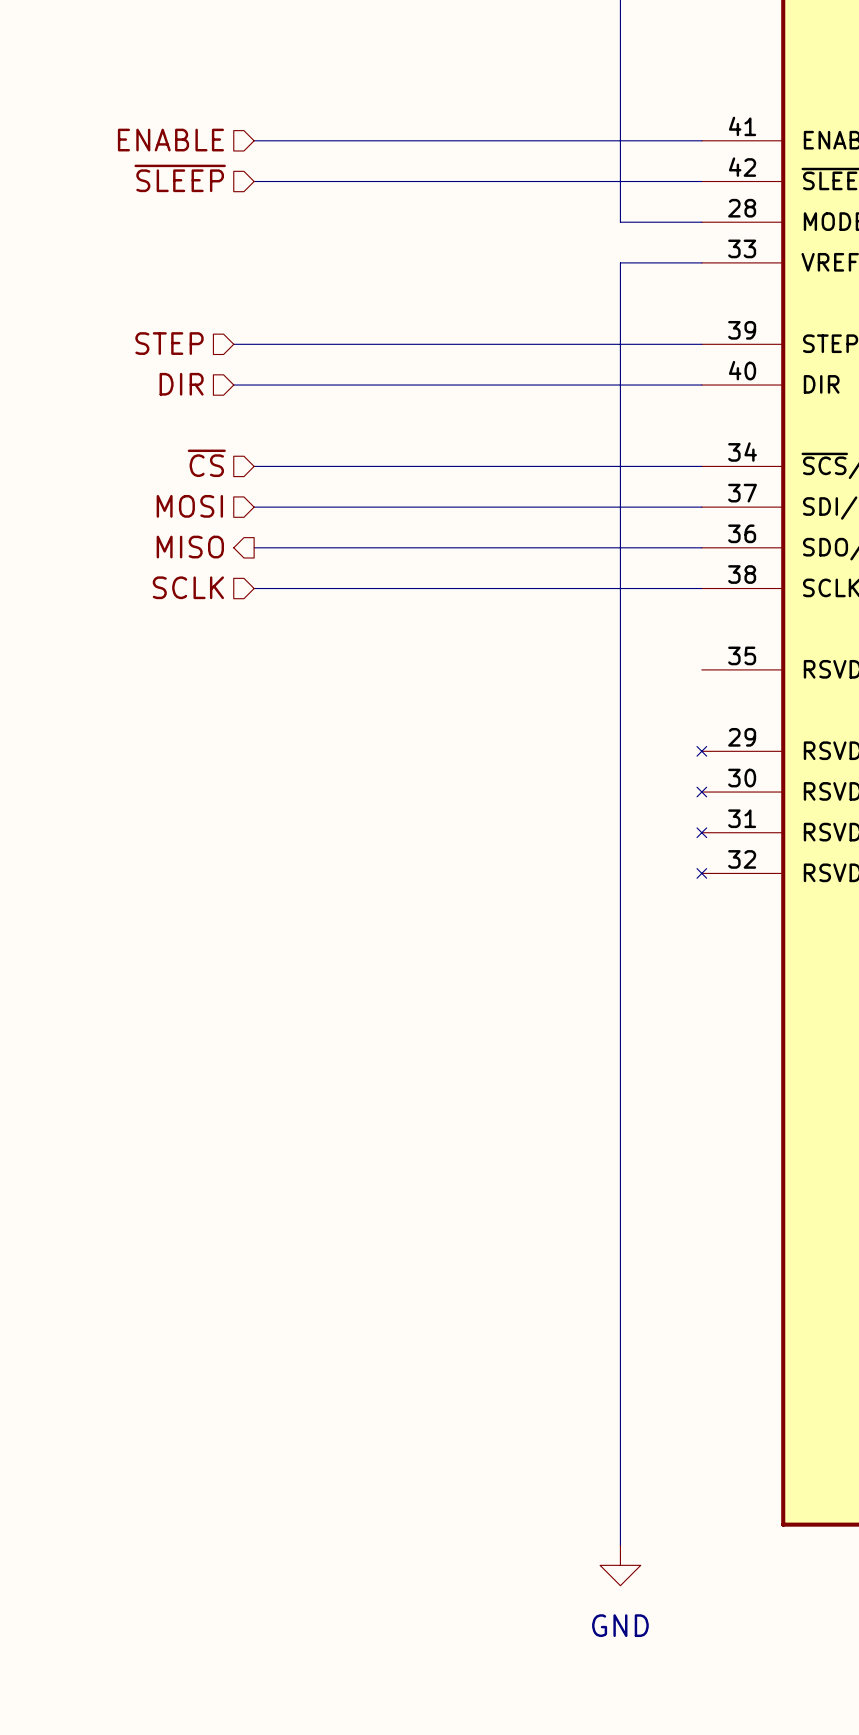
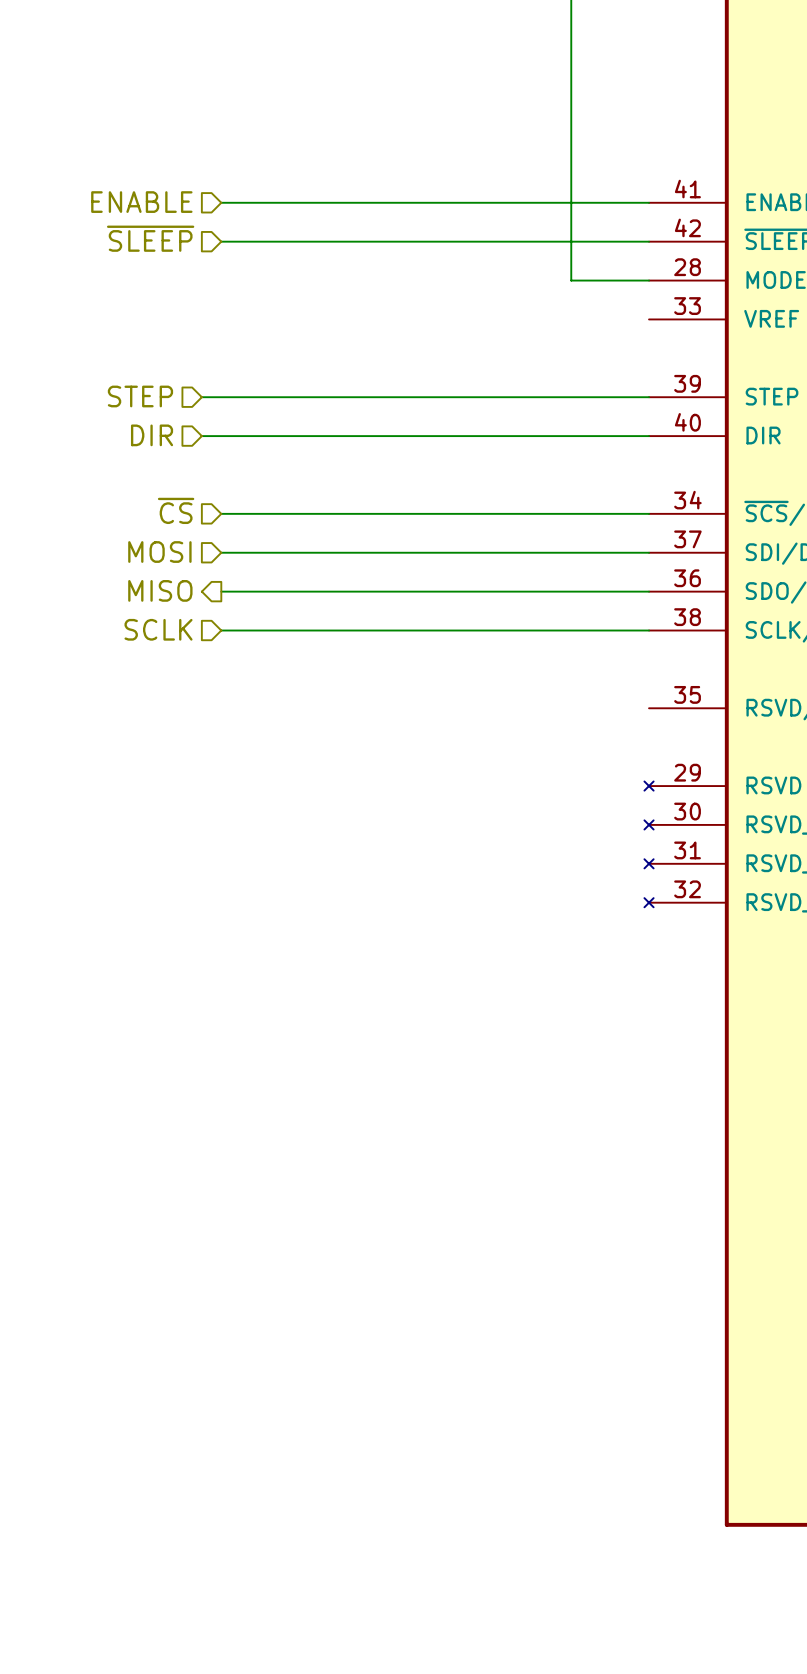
wire: (701, 262) (620, 262) (620, 1545) -> none
power symbol: GND (620, 1565) -> none

